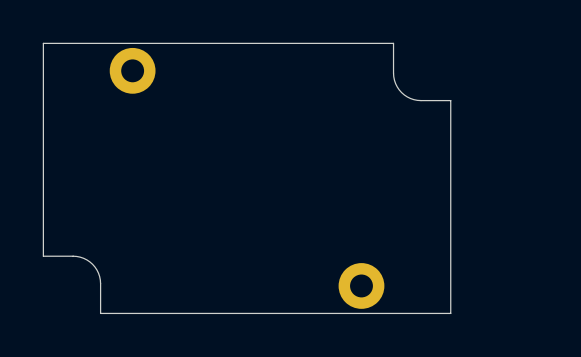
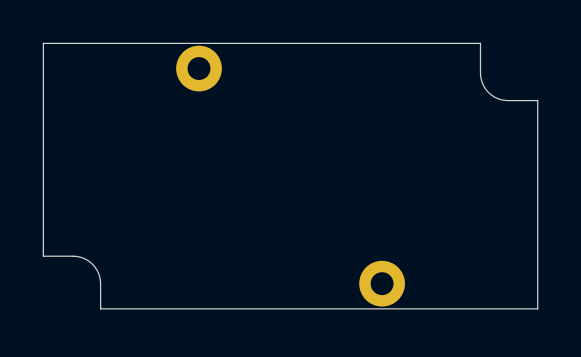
board edge: (393, 43) (393, 76) (401, 92) (417, 100) (450, 100) (450, 313) (100, 313) (100, 308) -> (393, 43) (480, 43) (480, 76) (488, 92) (504, 100) (537, 100) (537, 308) (100, 308)
part position: (132, 70) -> (199, 68)
part position: (361, 285) -> (382, 283)

